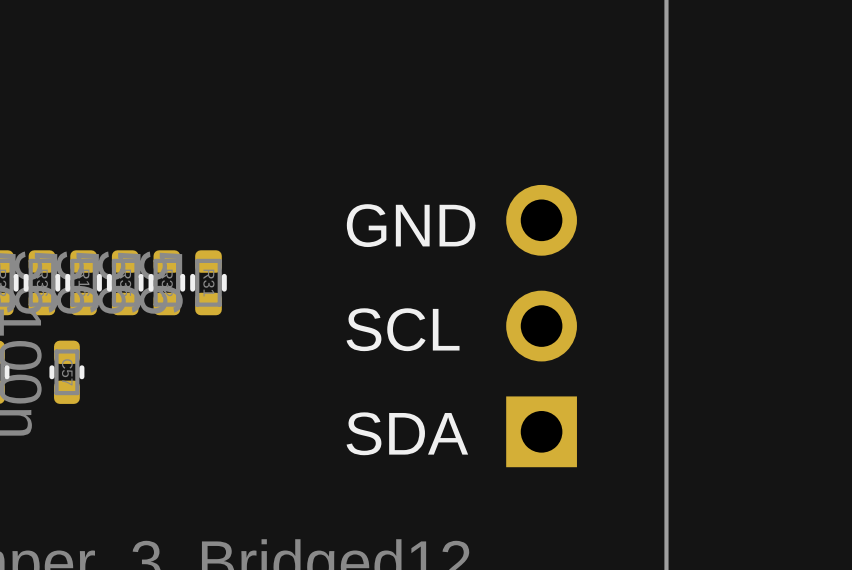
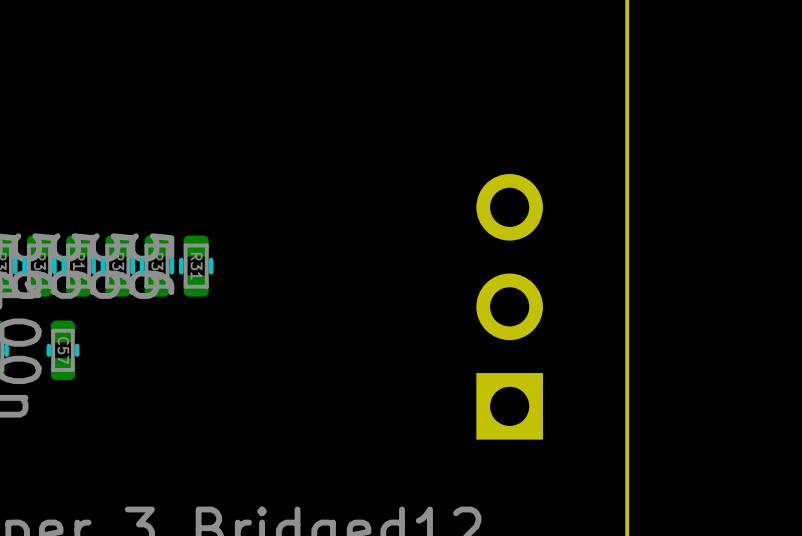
text: GND (411, 225) -> none
text: SCL (403, 329) -> none
text: SDA (407, 433) -> none

